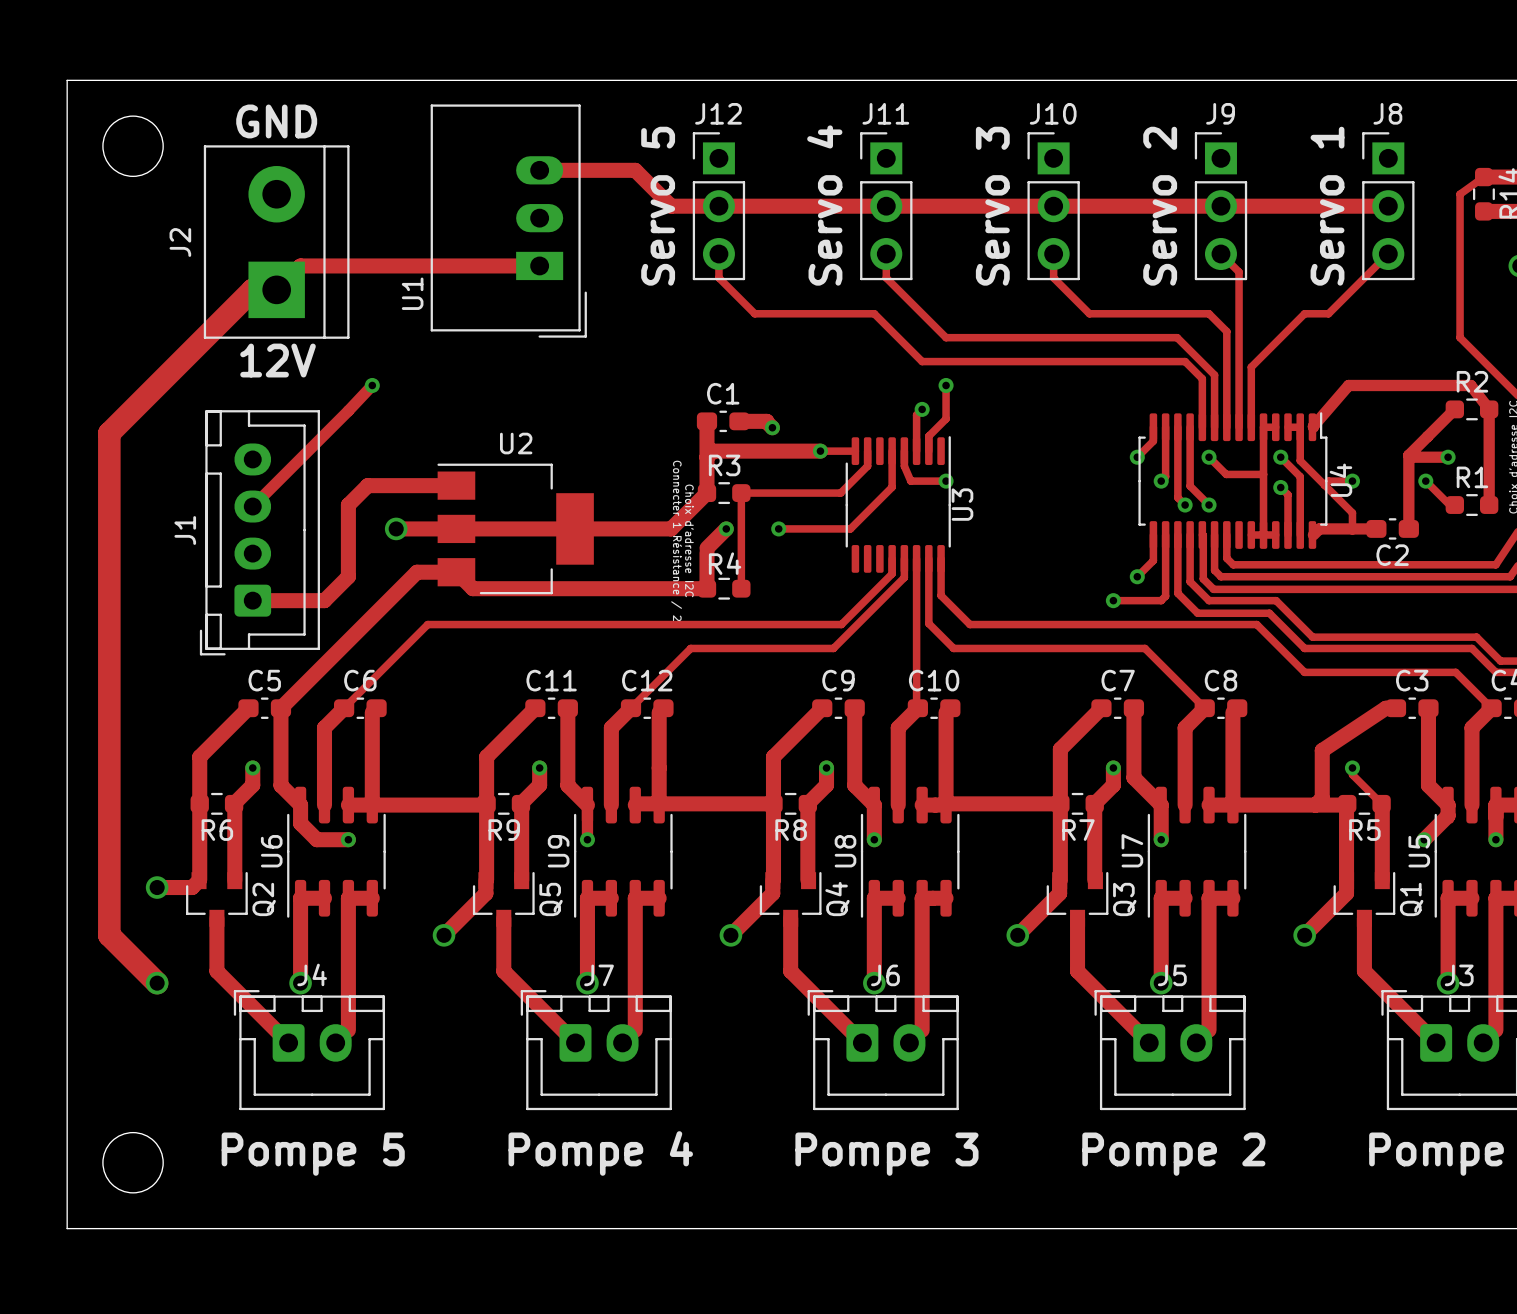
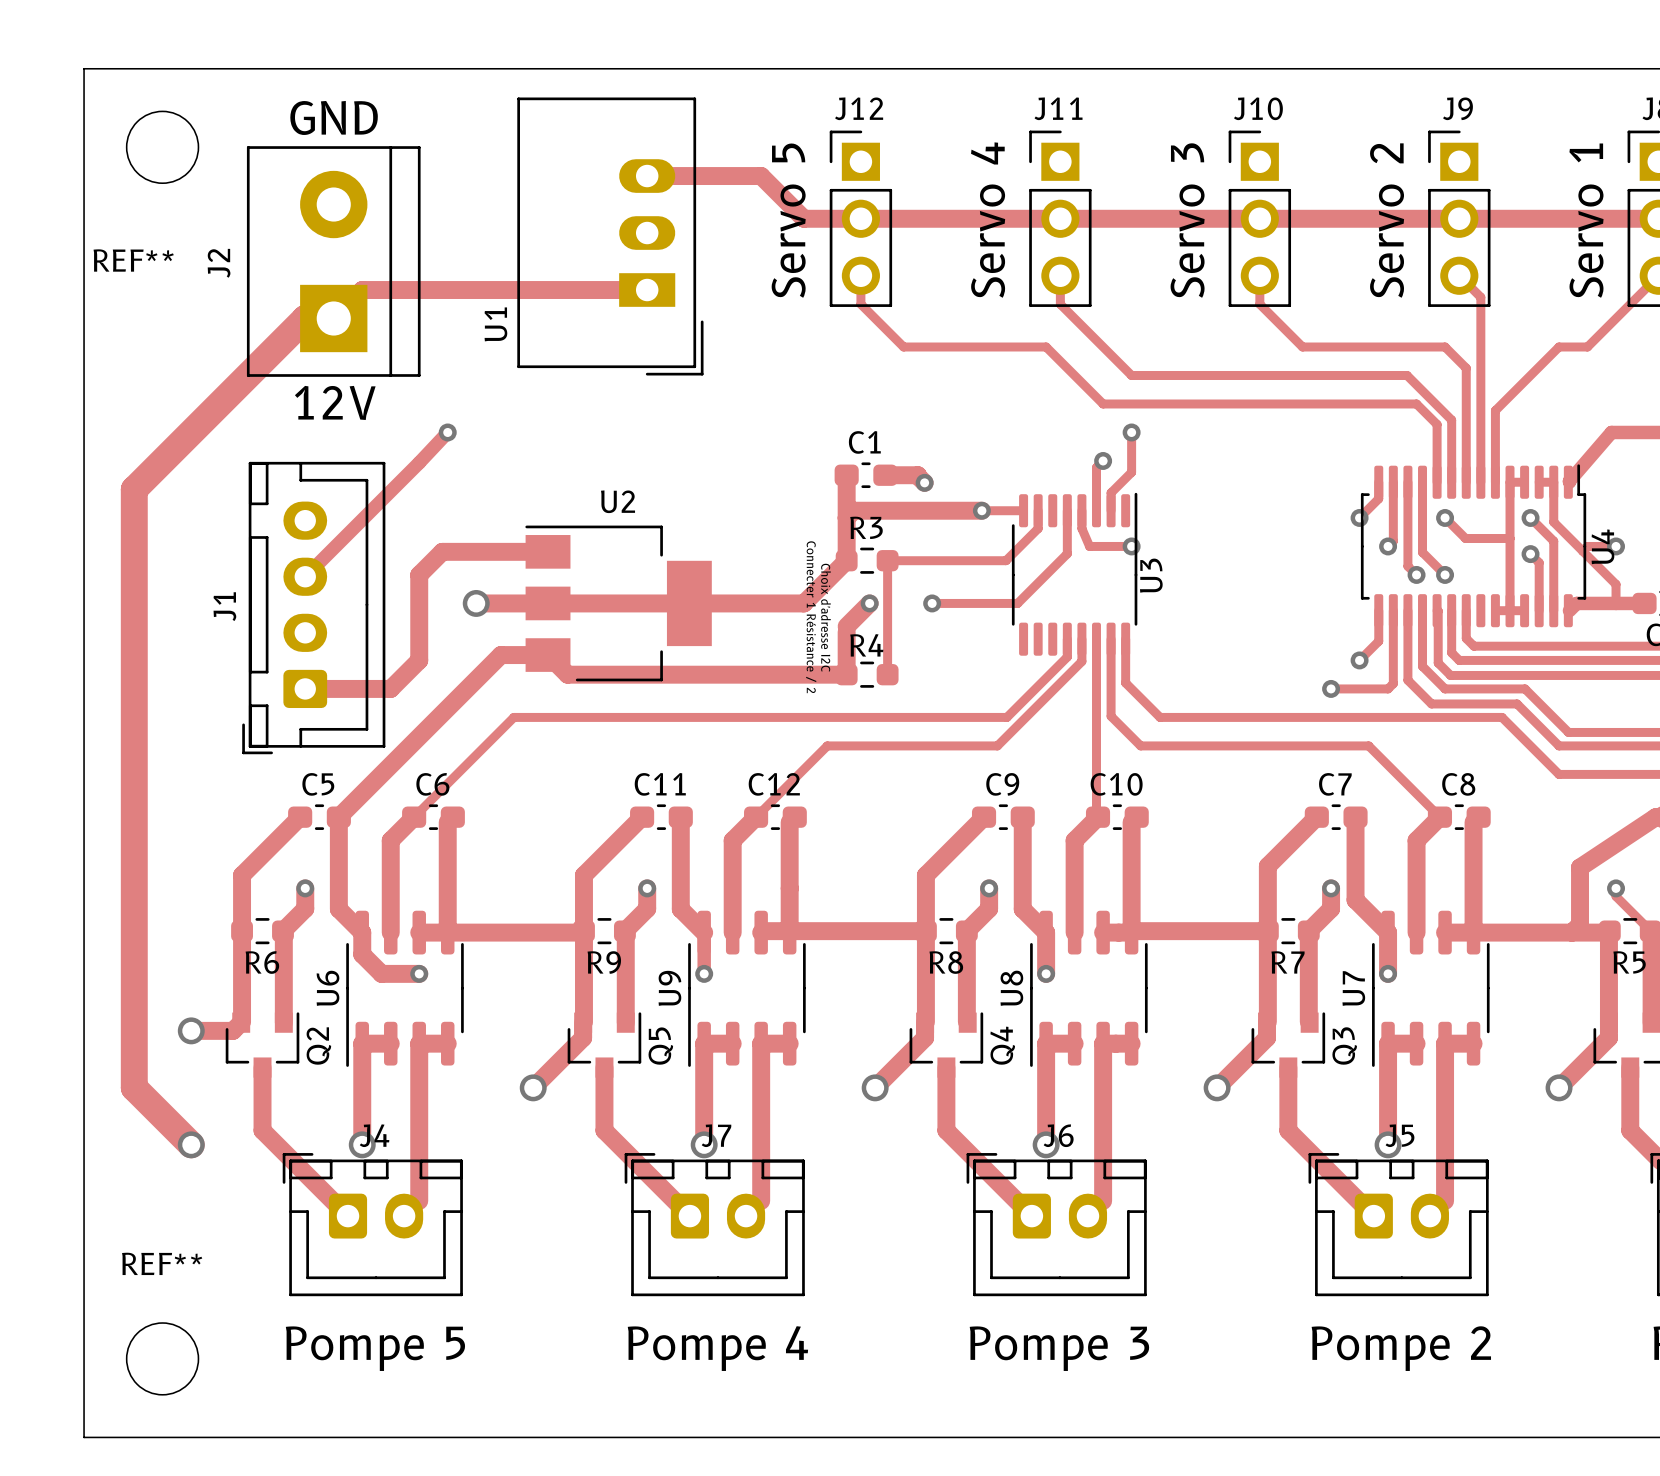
REF** name: none -> REF** (133, 260)
REF** name: none -> REF** (162, 1263)

